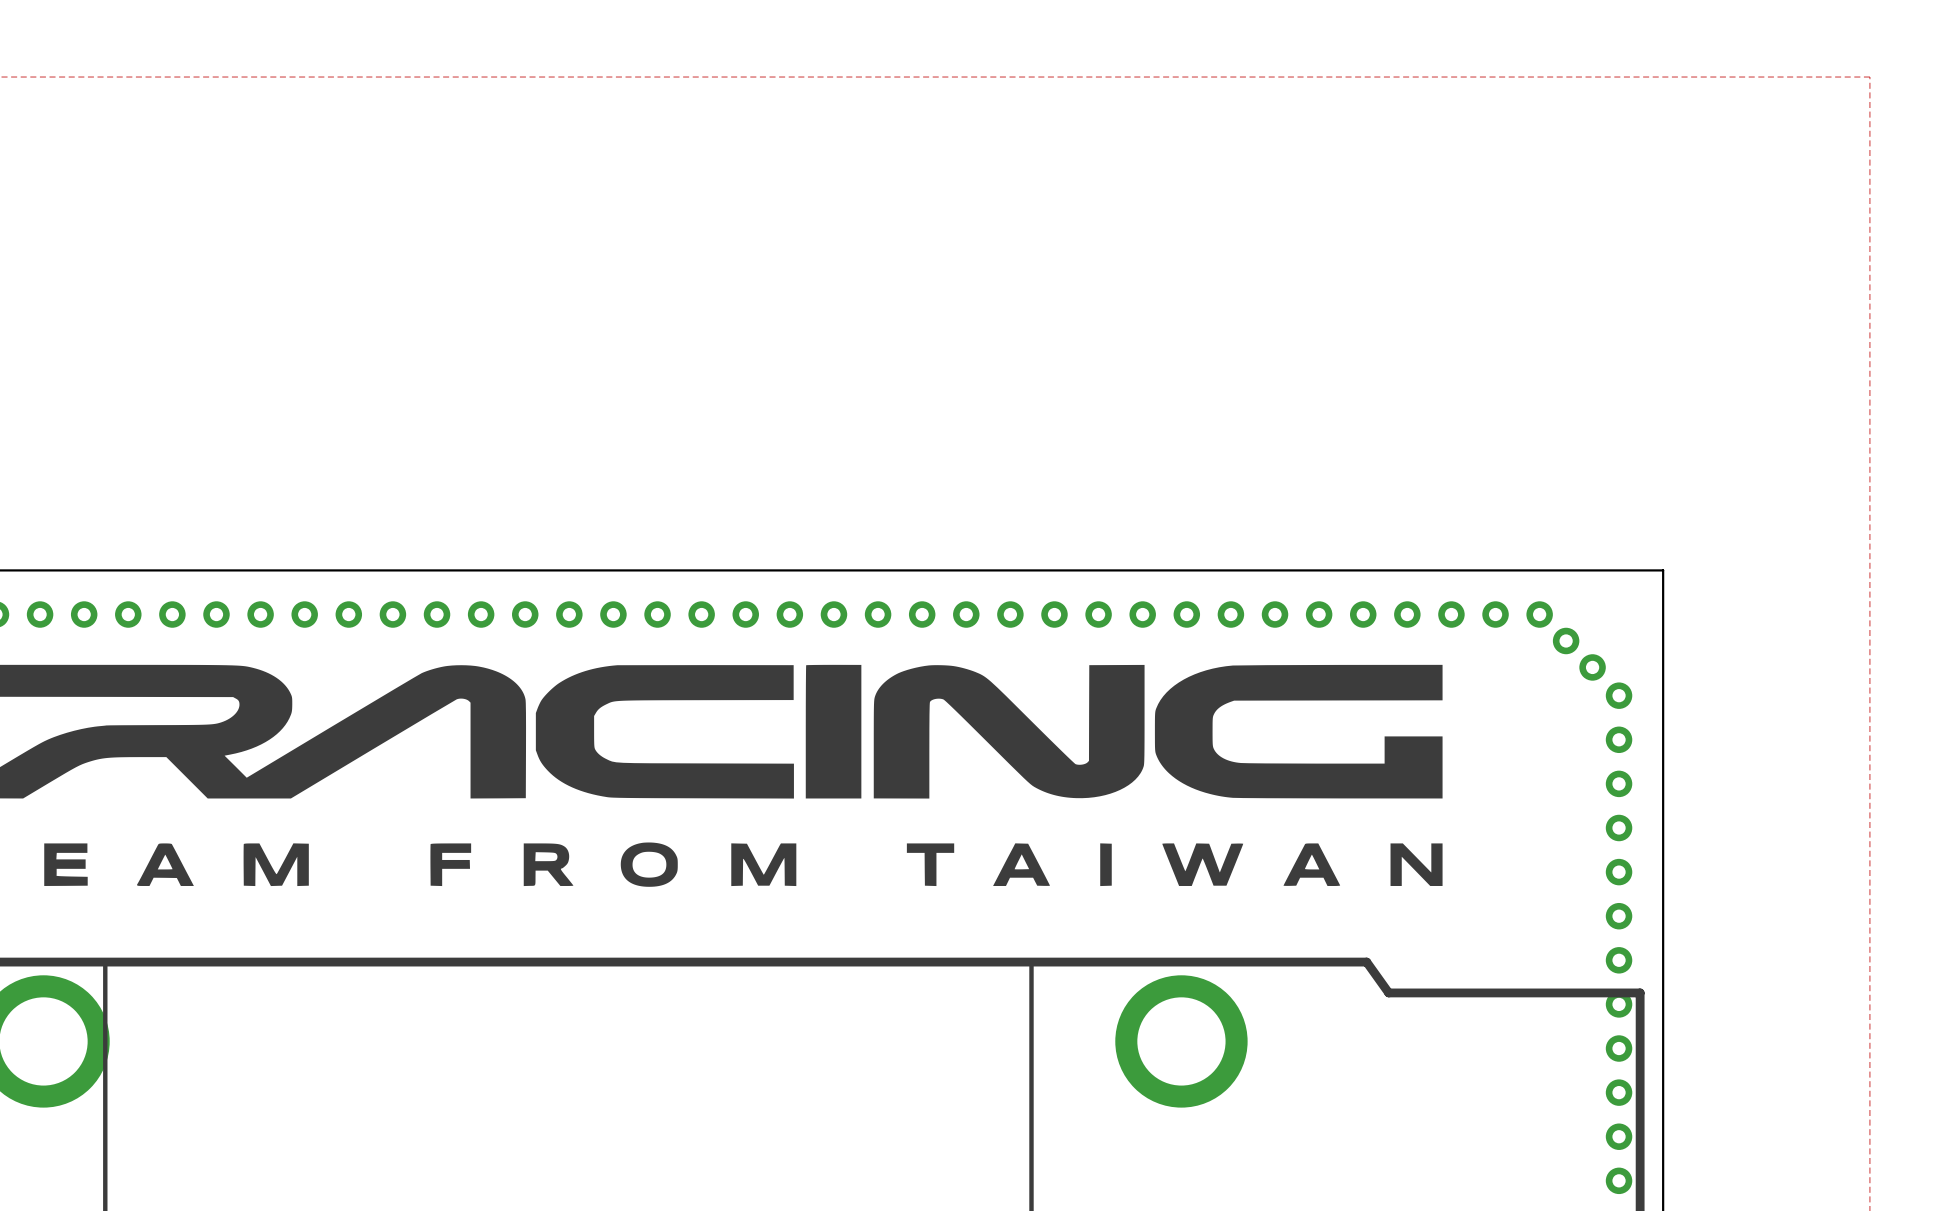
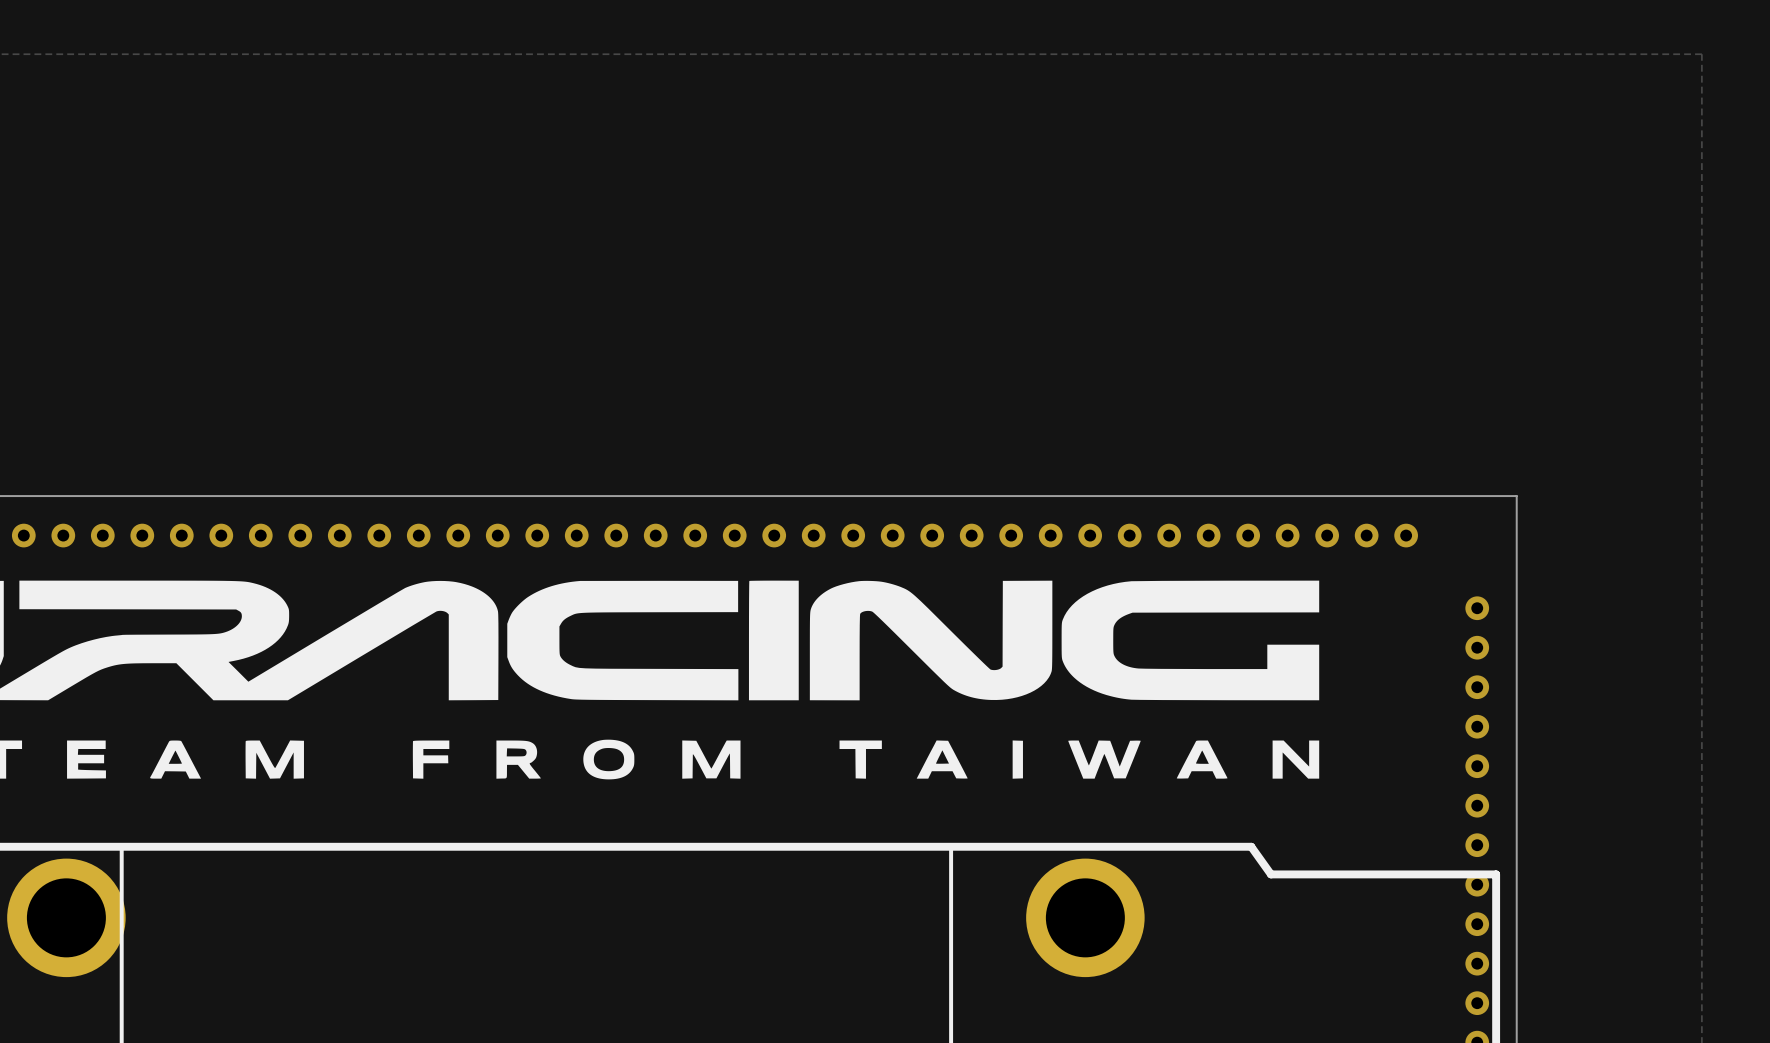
via: (1566, 640) -> none
via: (1592, 667) -> none

